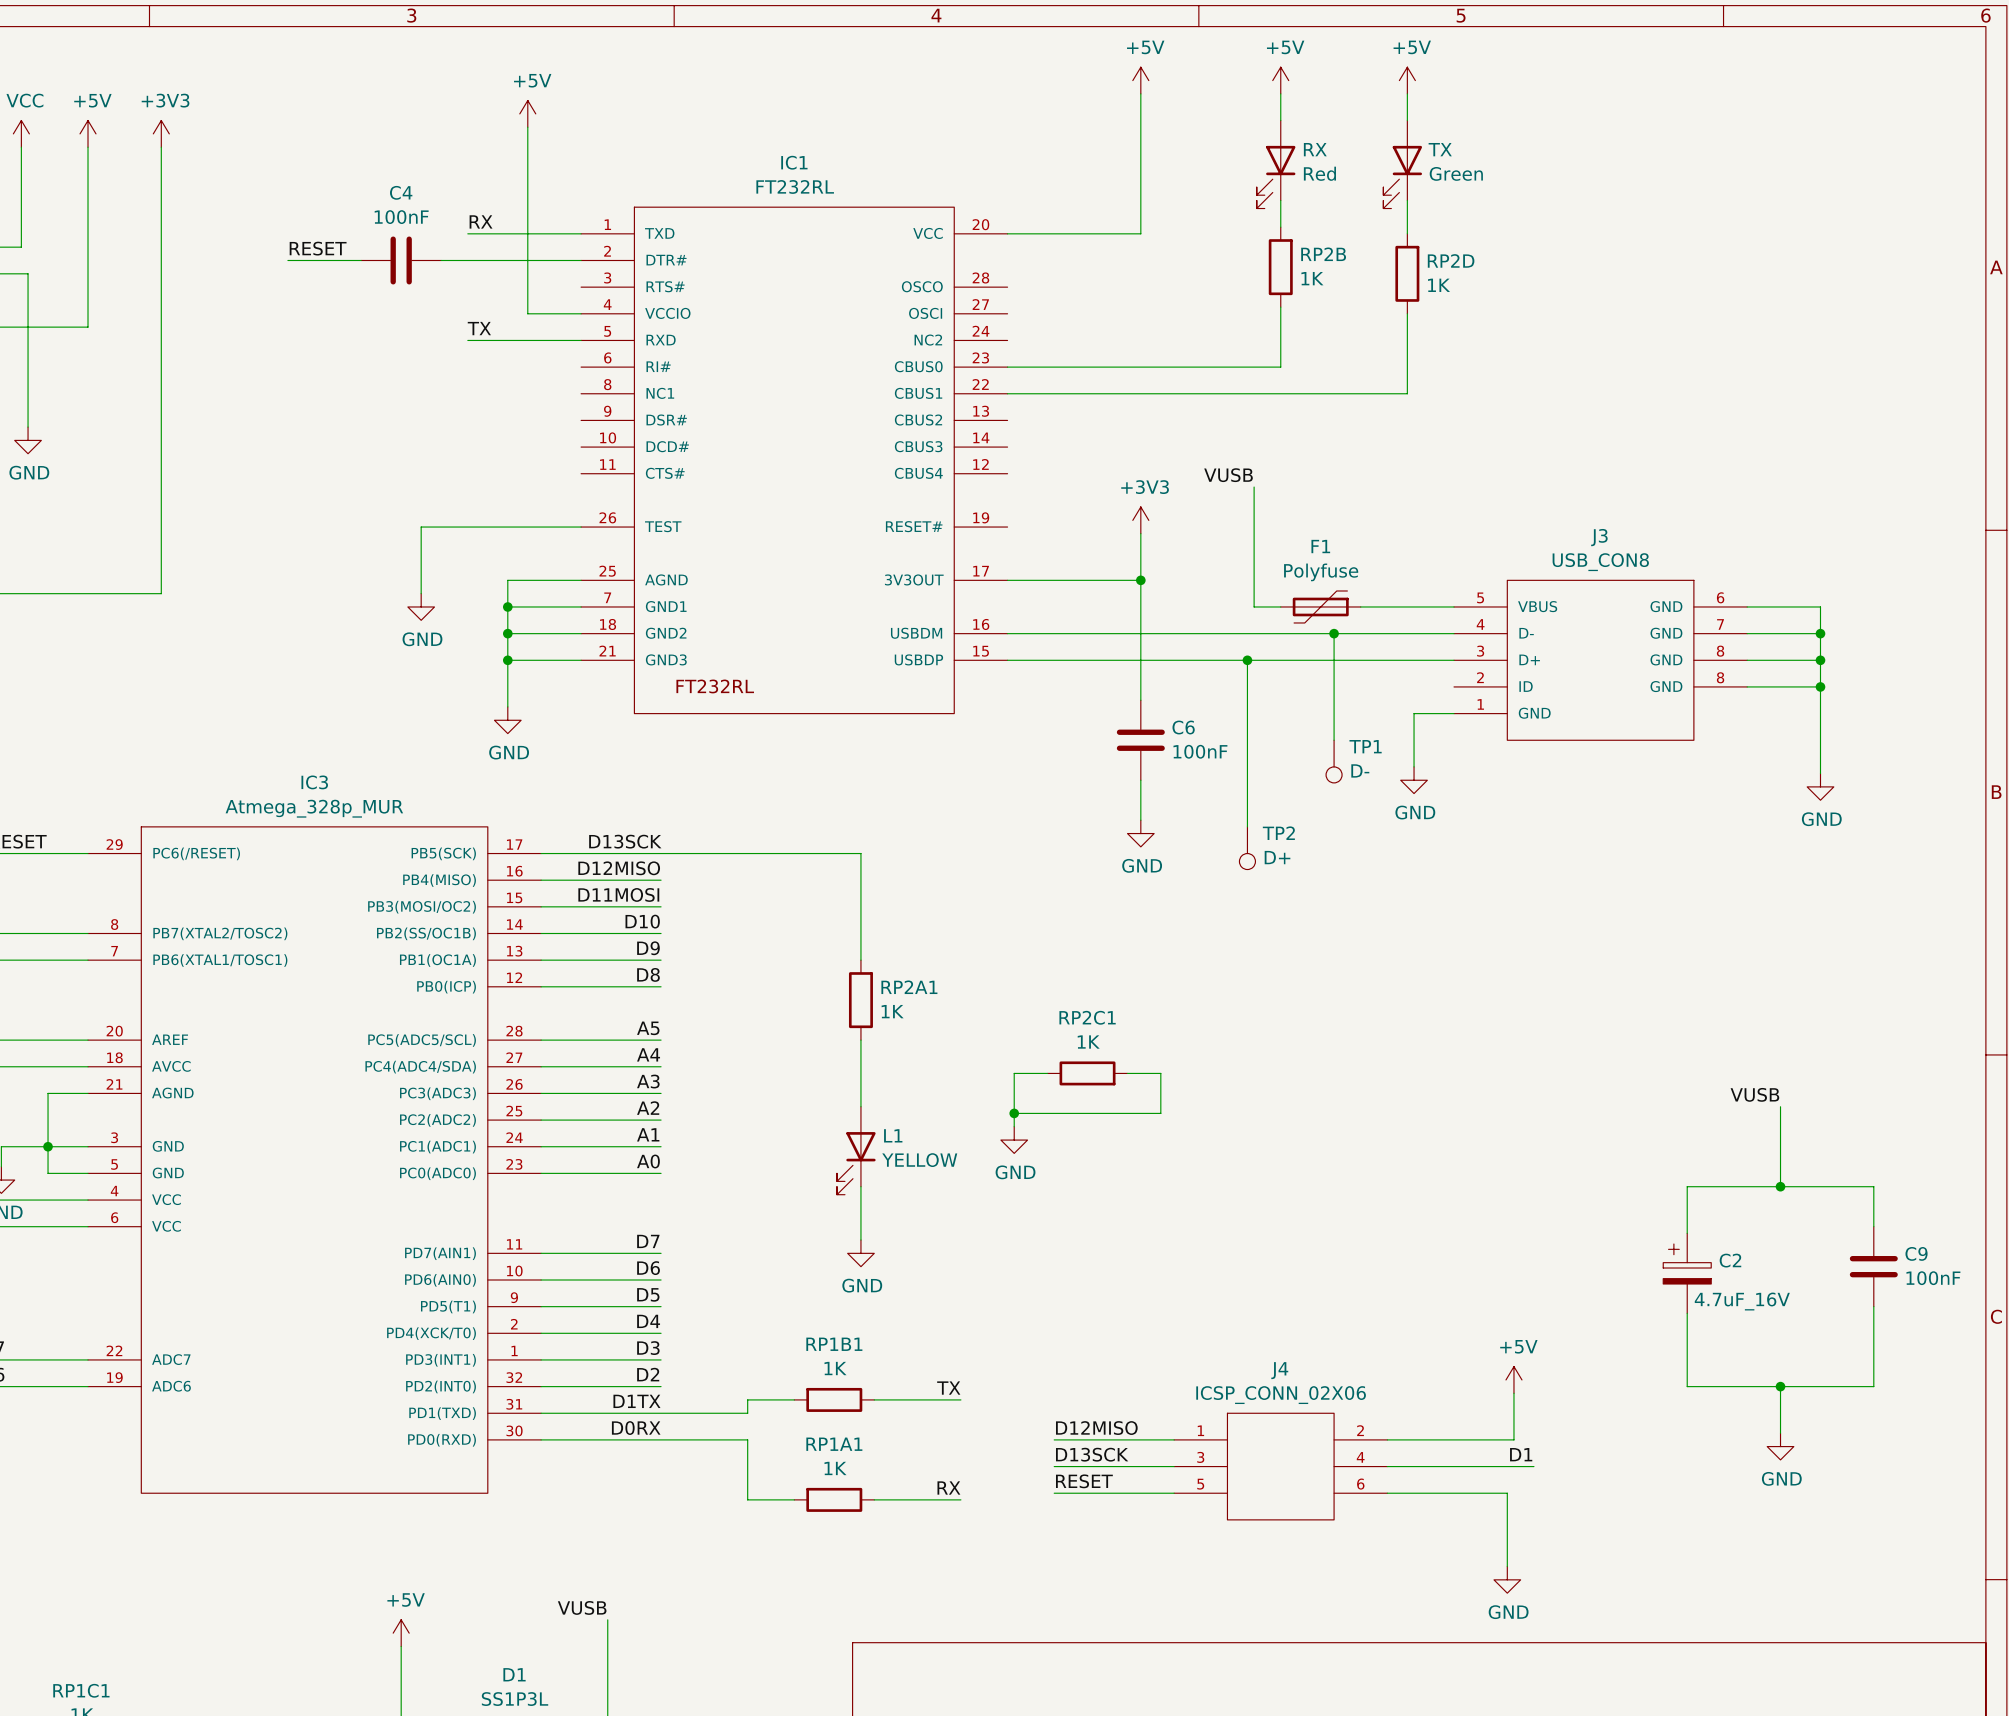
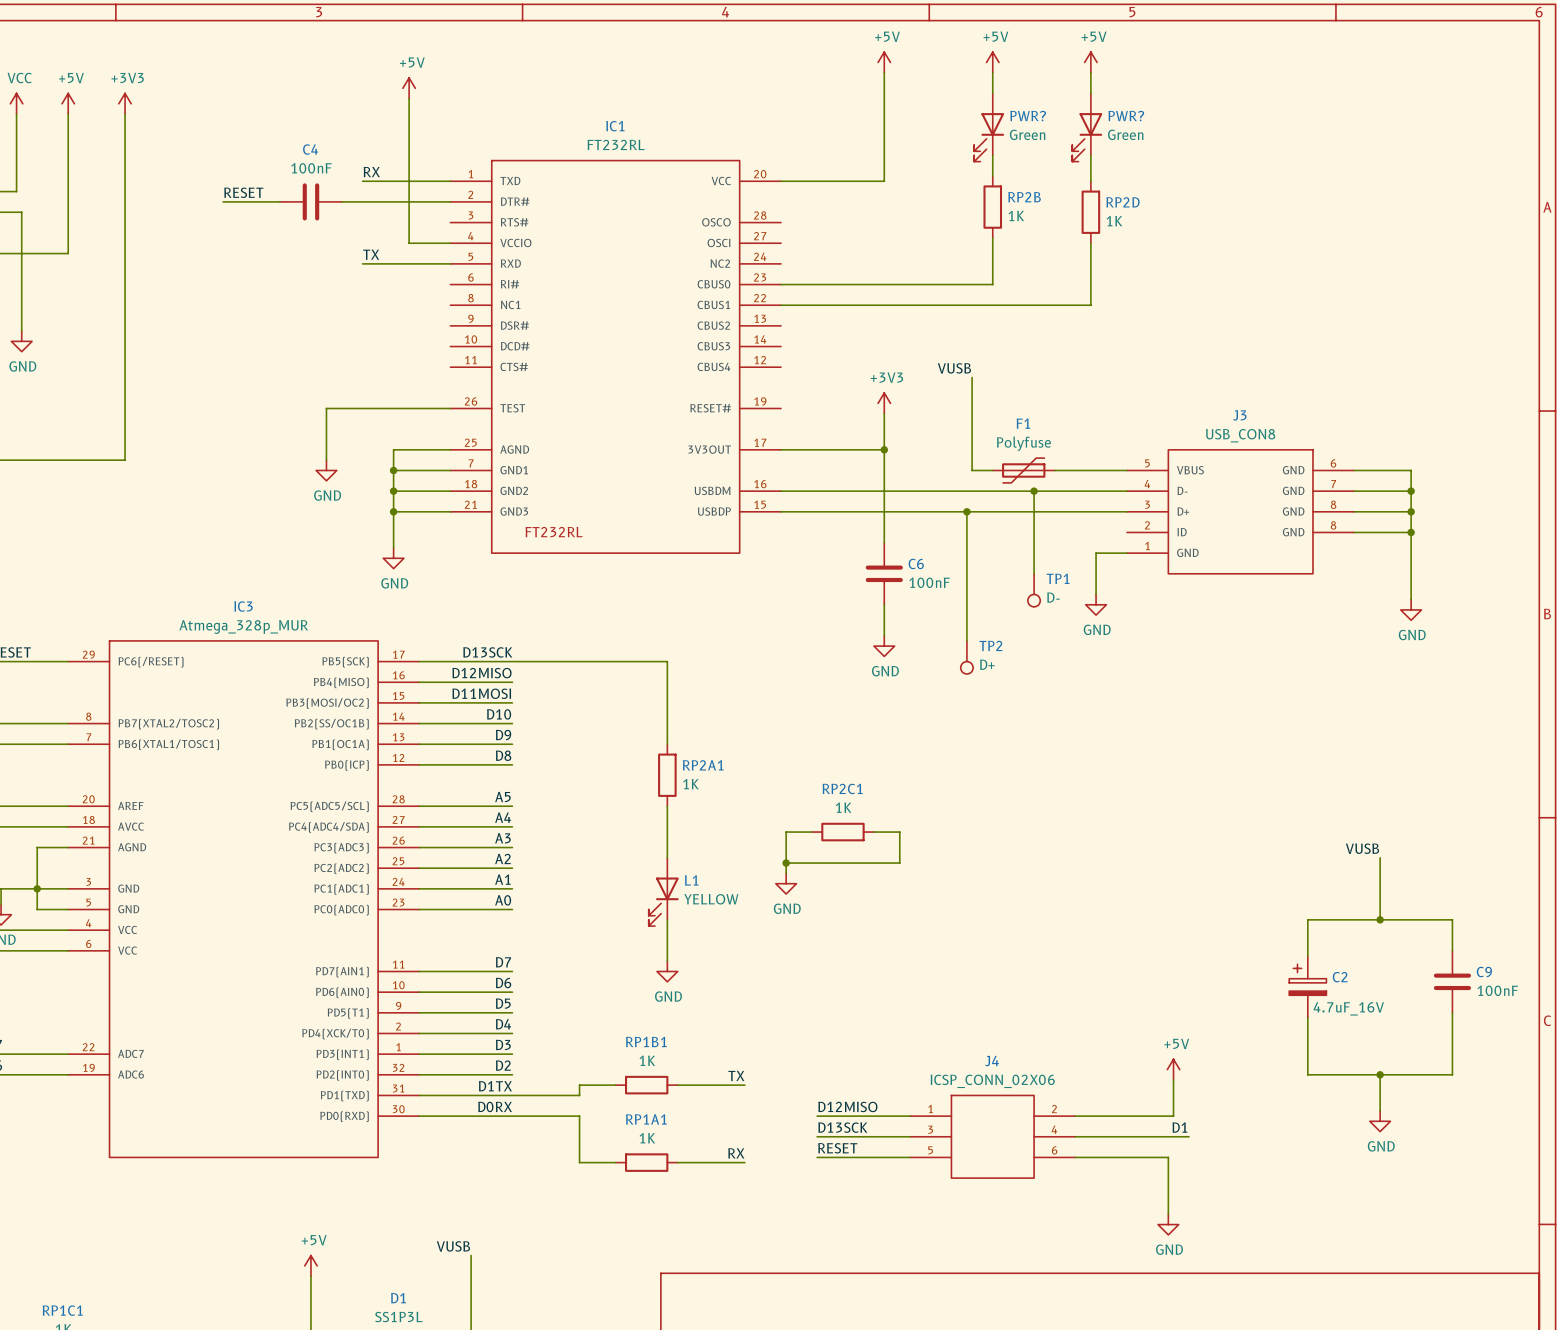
RX name: RX (1315, 149) -> PWR? (1028, 116)
TX name: TX (1440, 149) -> PWR? (1126, 116)
RX value: Red (1319, 173) -> Green (1027, 134)

